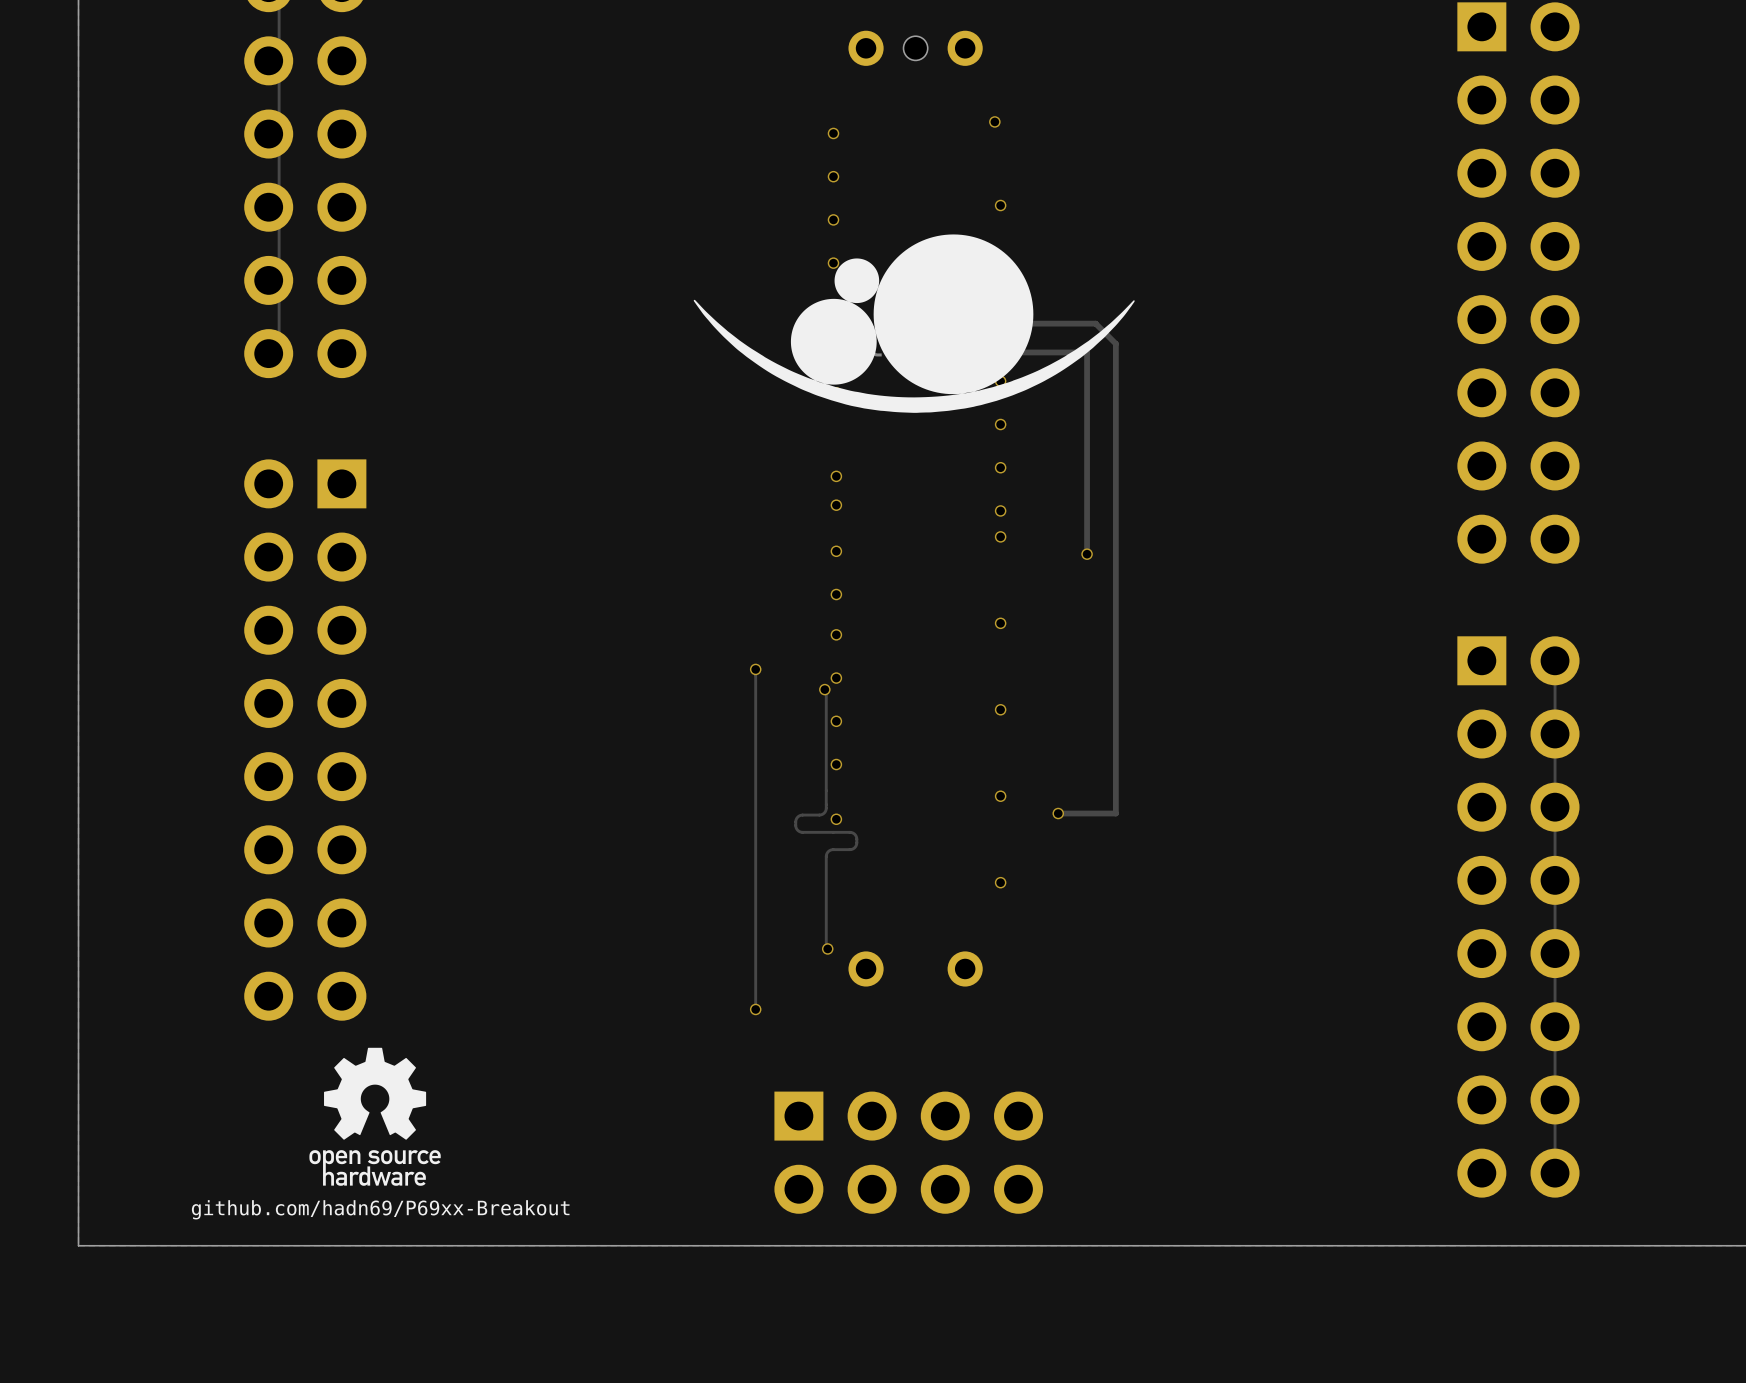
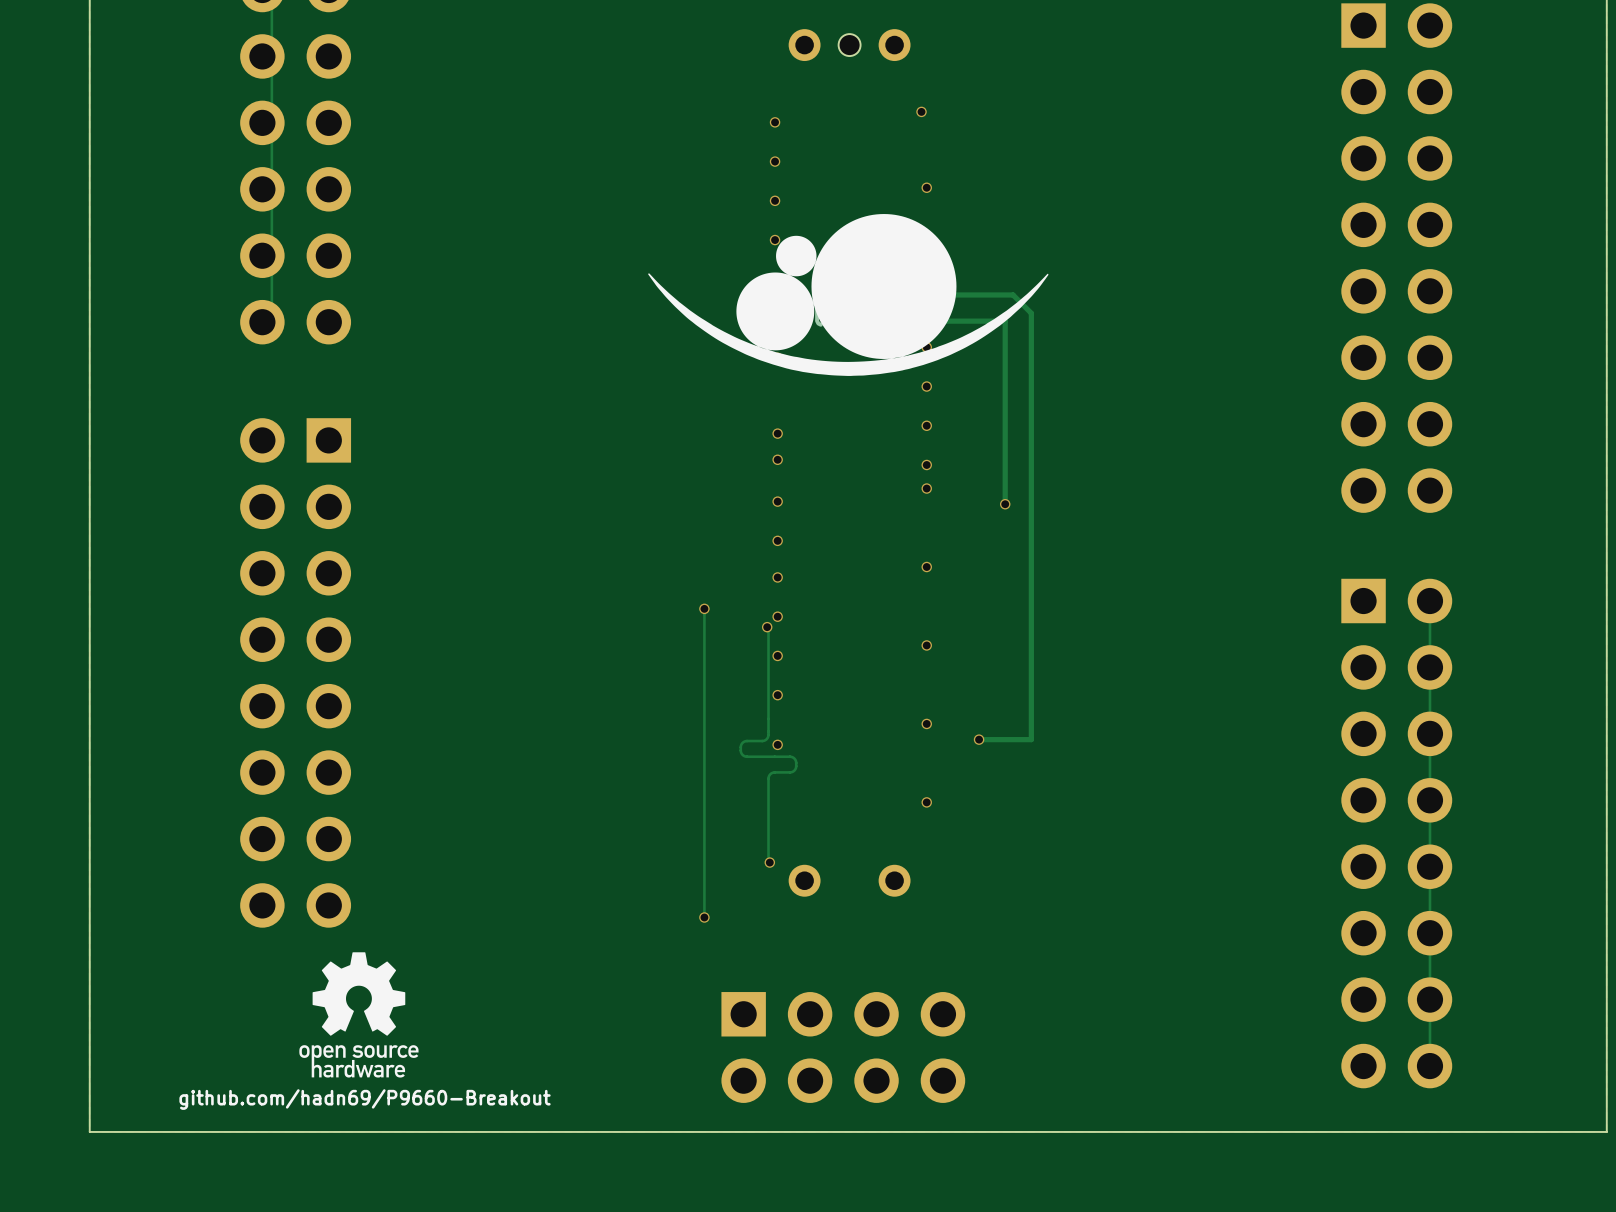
text: github.com/hadn69/P69xx-Breakout (380, 1209) -> github.com/hadn69/P9660-Breakout (365, 1099)

